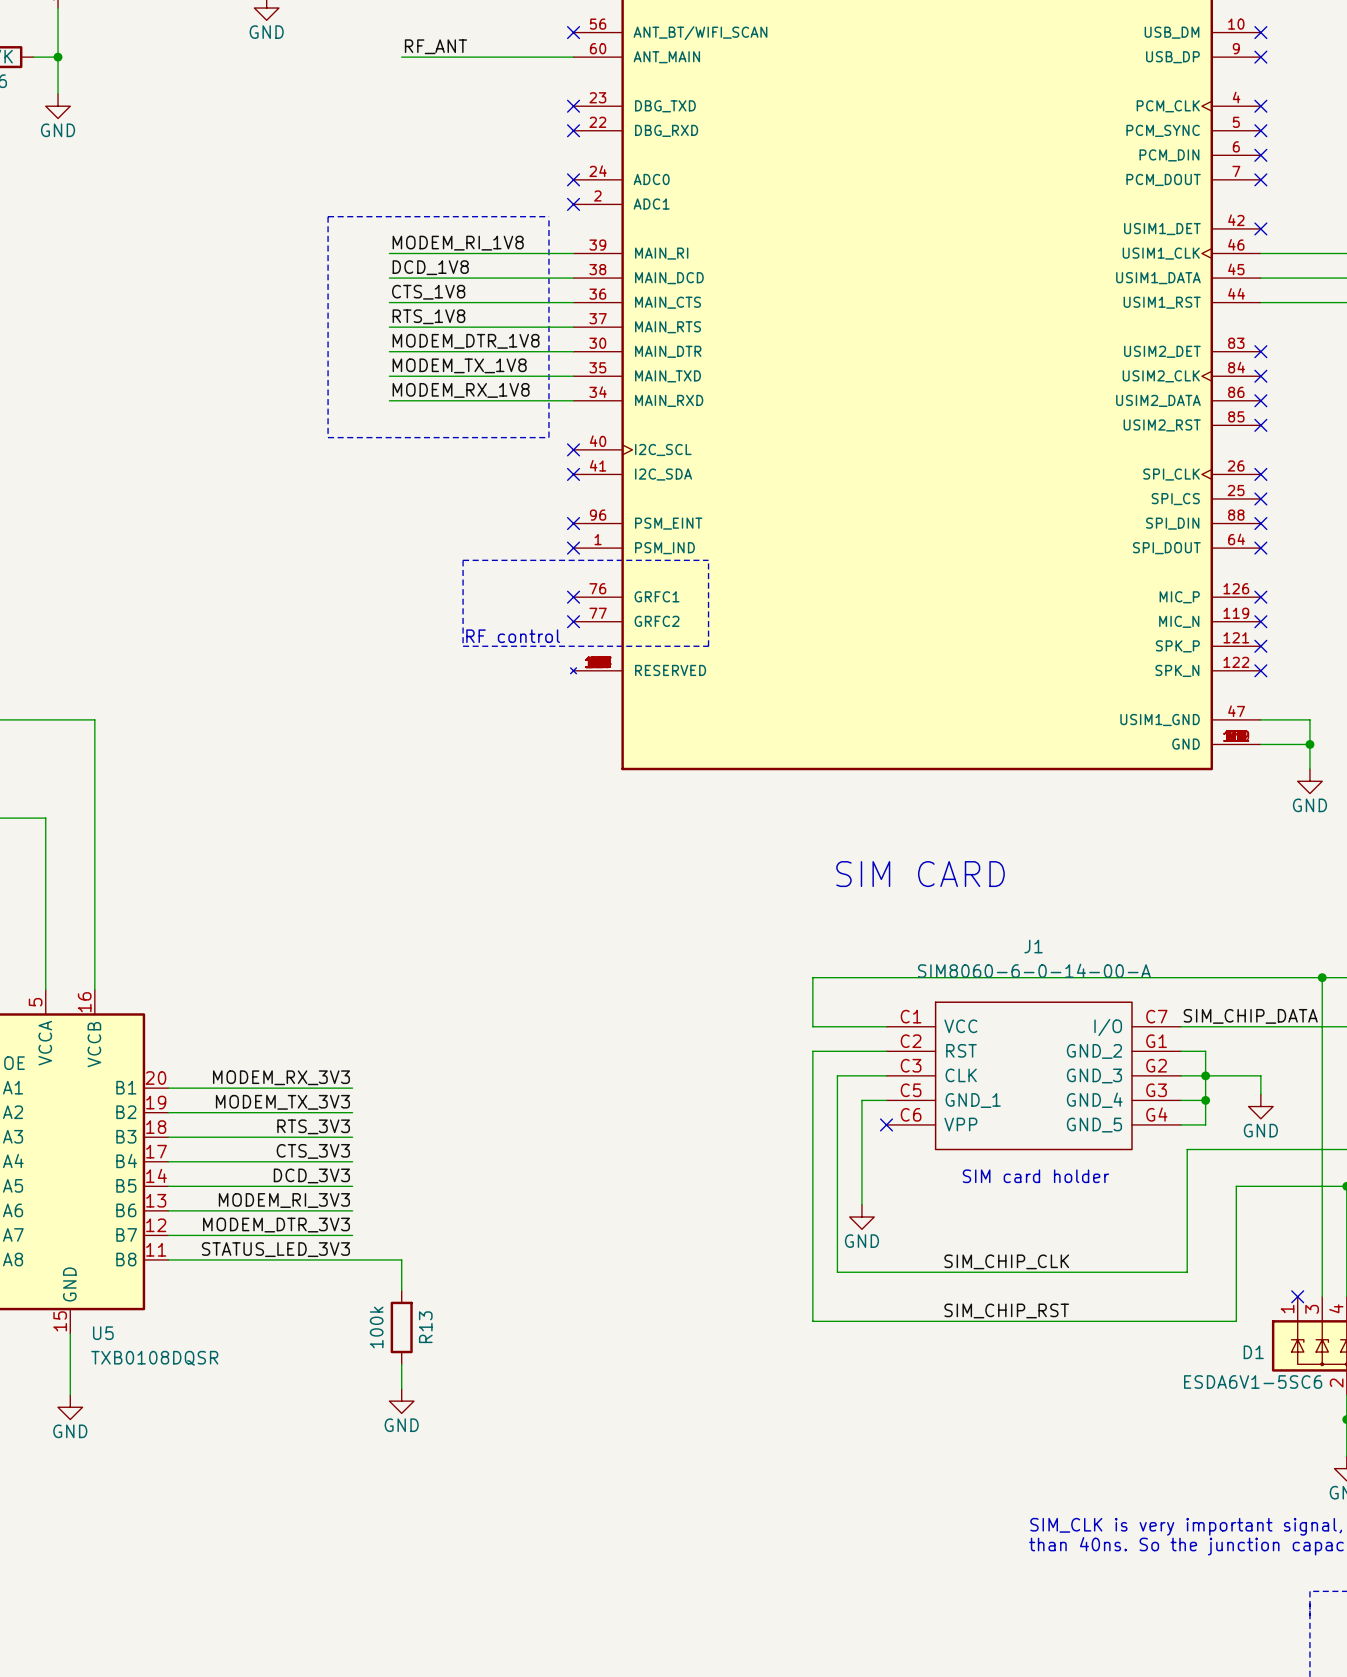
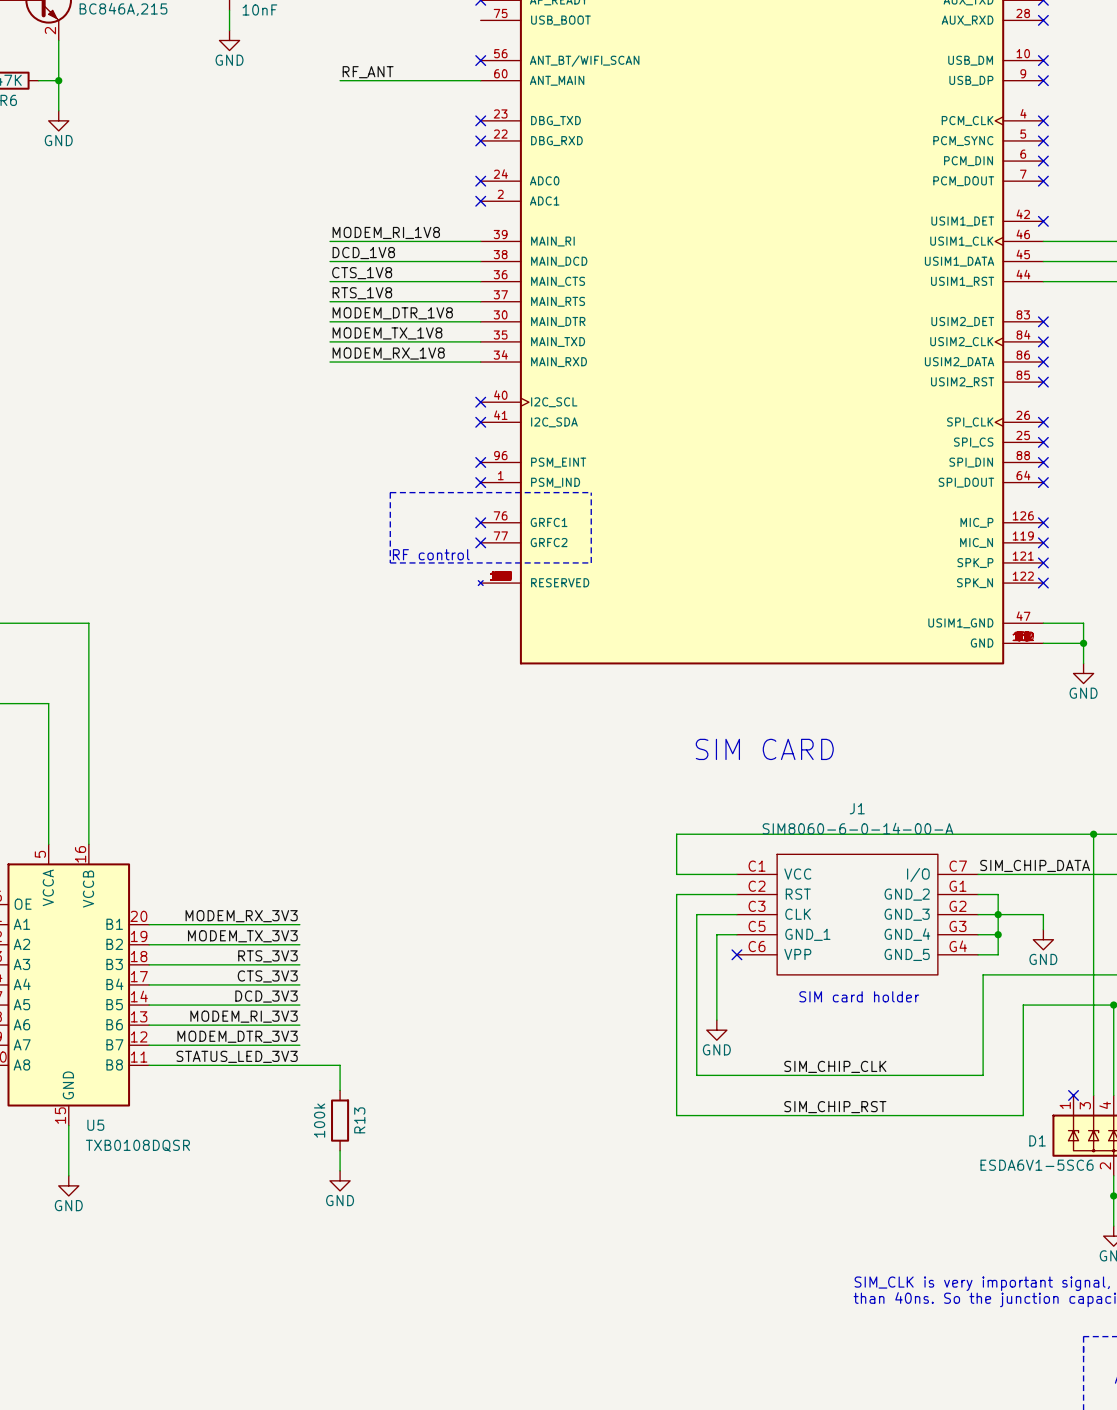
line: (328, 216) (328, 437) (548, 437) (548, 216) (328, 216) -> none

